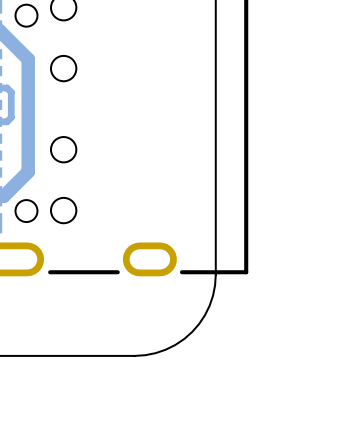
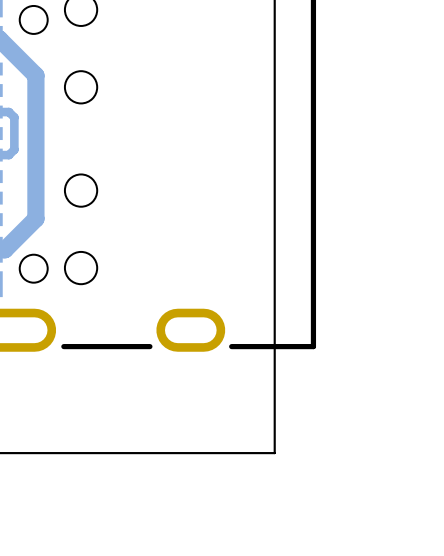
board edge: (215, 274) (209, 305) (192, 332) (165, 349) (134, 355) -> (274, 349) (274, 453) (171, 453)

